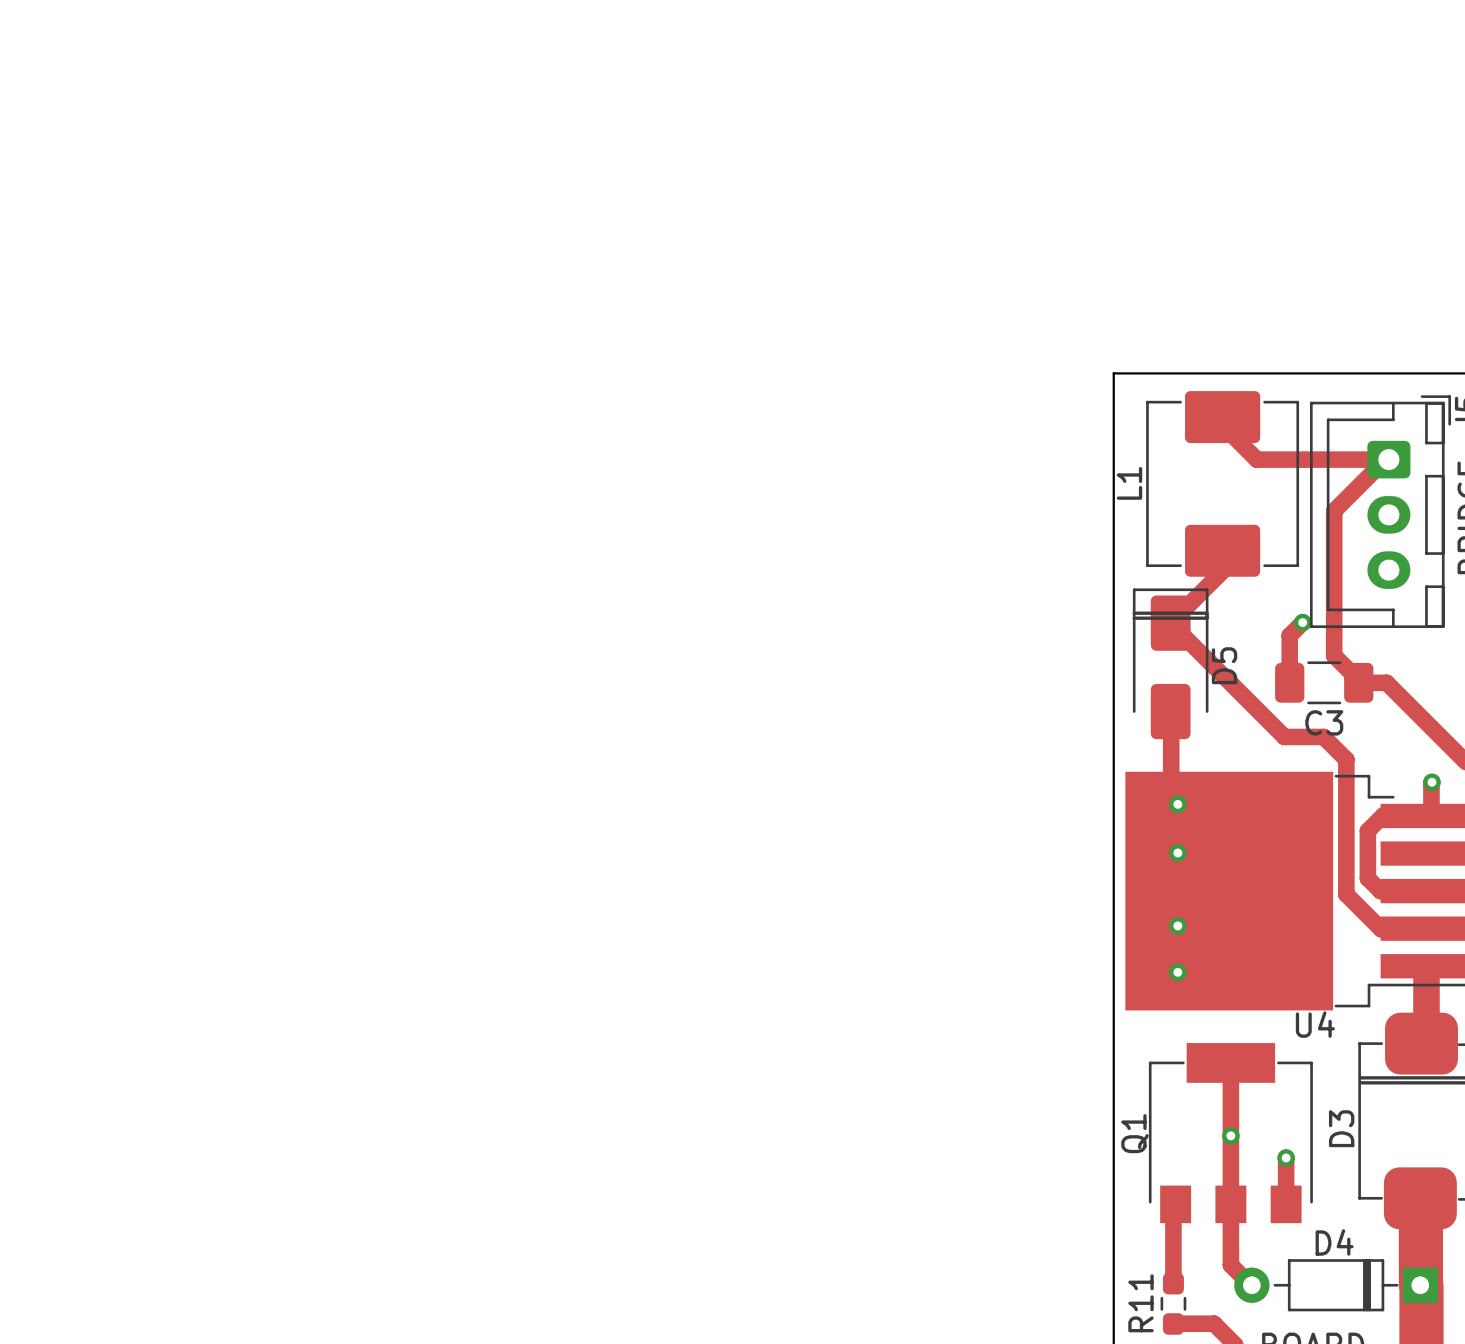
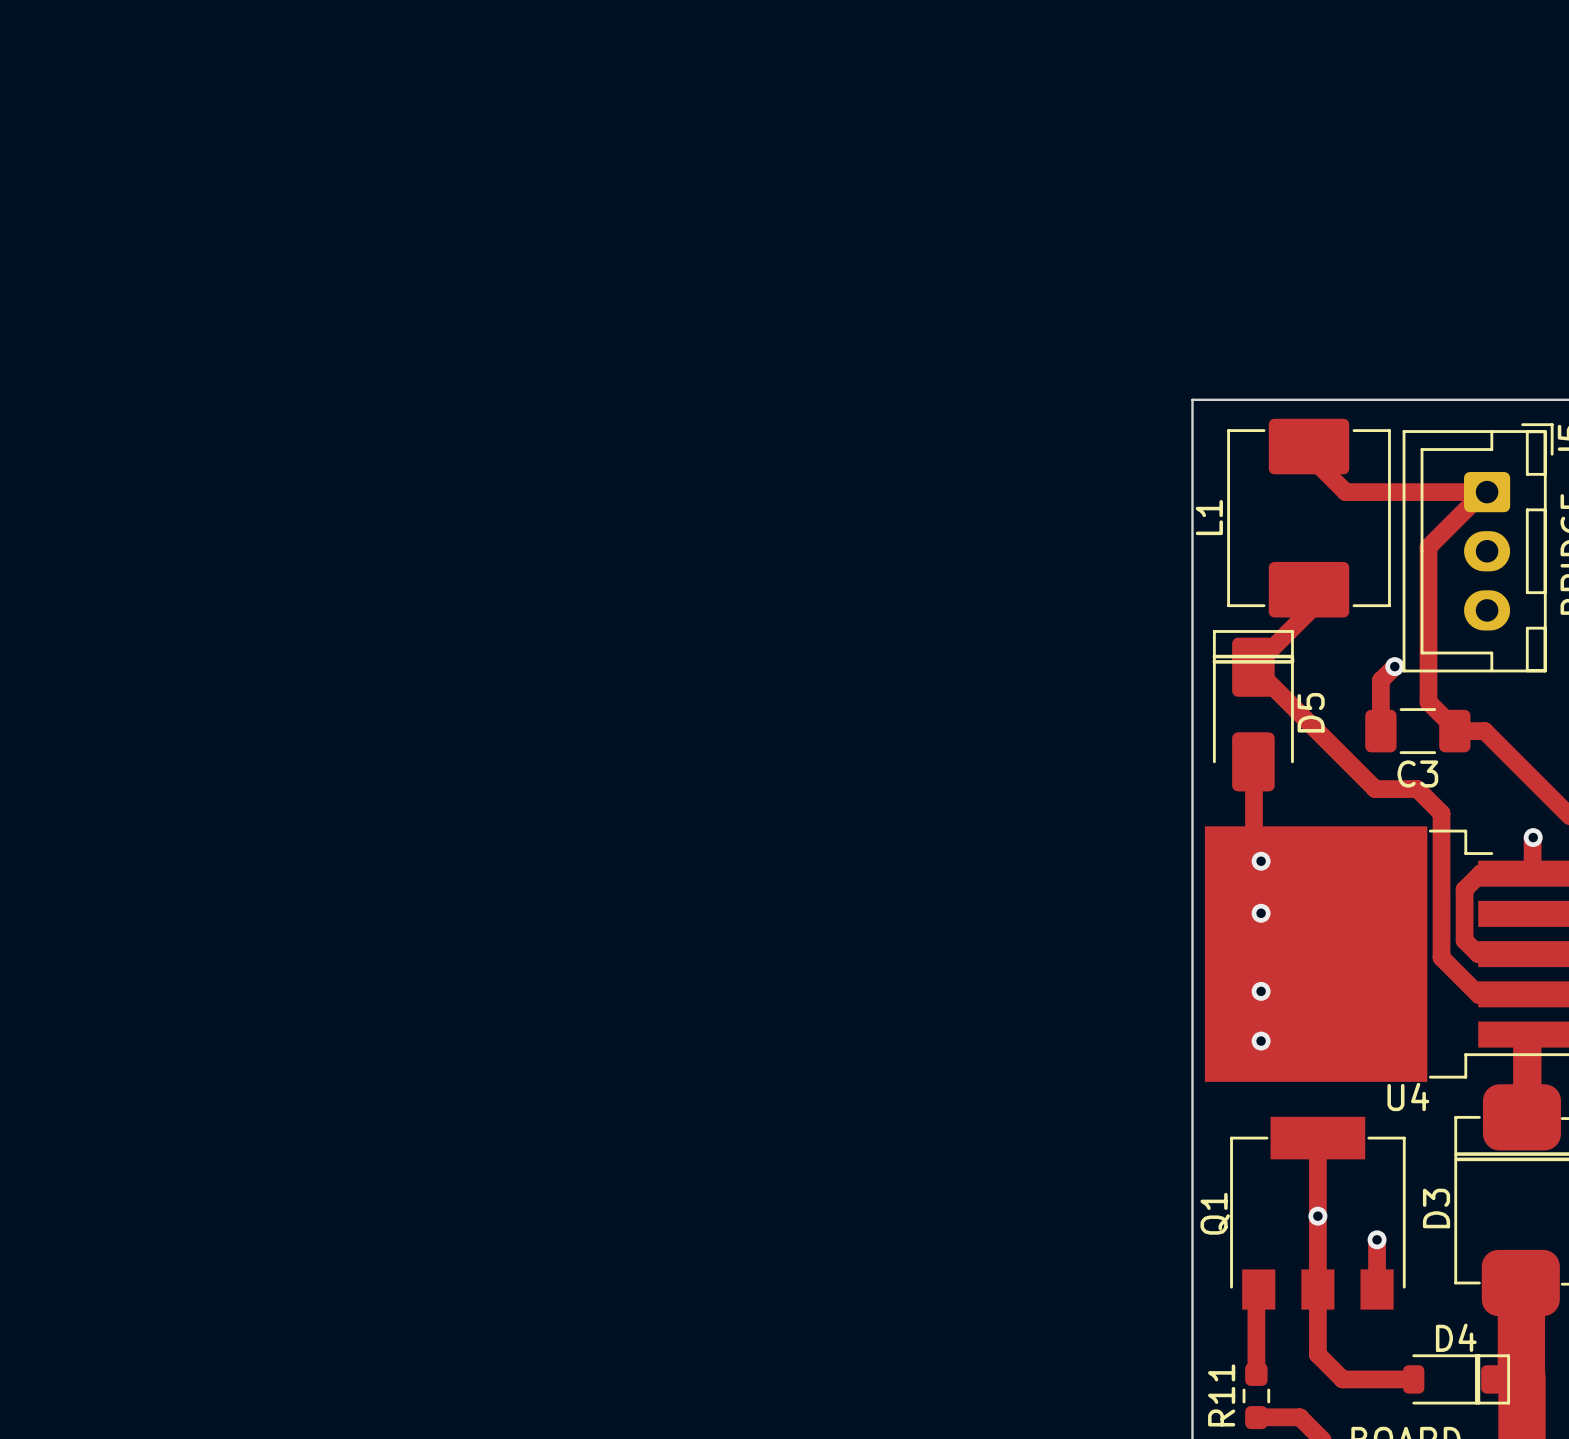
D4 footprint: [1234, 1259, 1438, 1312] -> [1403, 1354, 1511, 1405]
track: none -> (1342, 1378) (1409, 1379)

